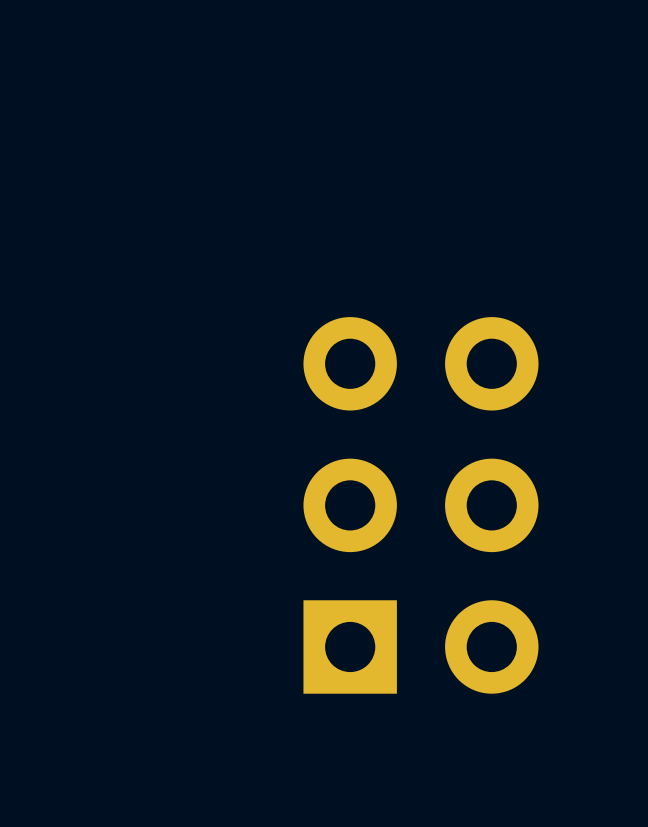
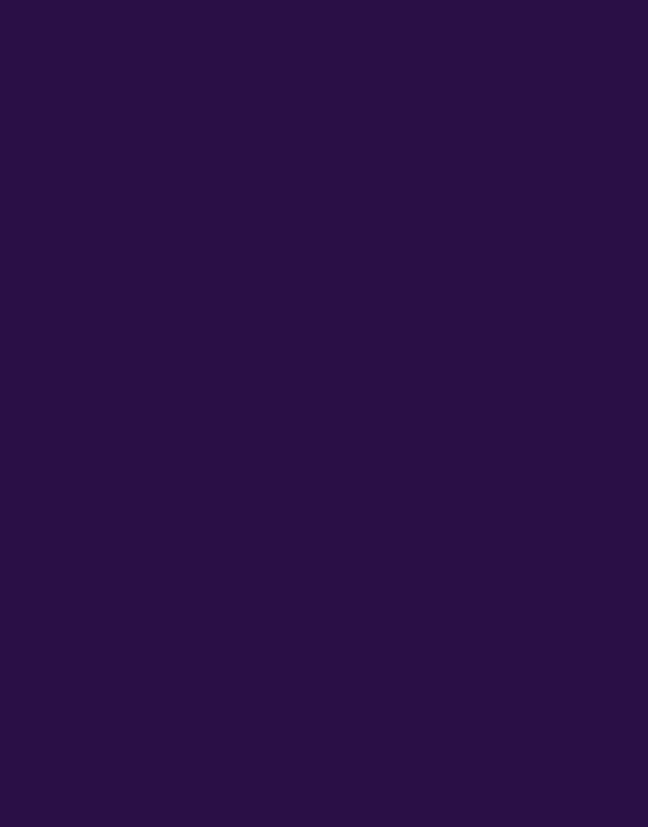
part: (420, 505) -> none

